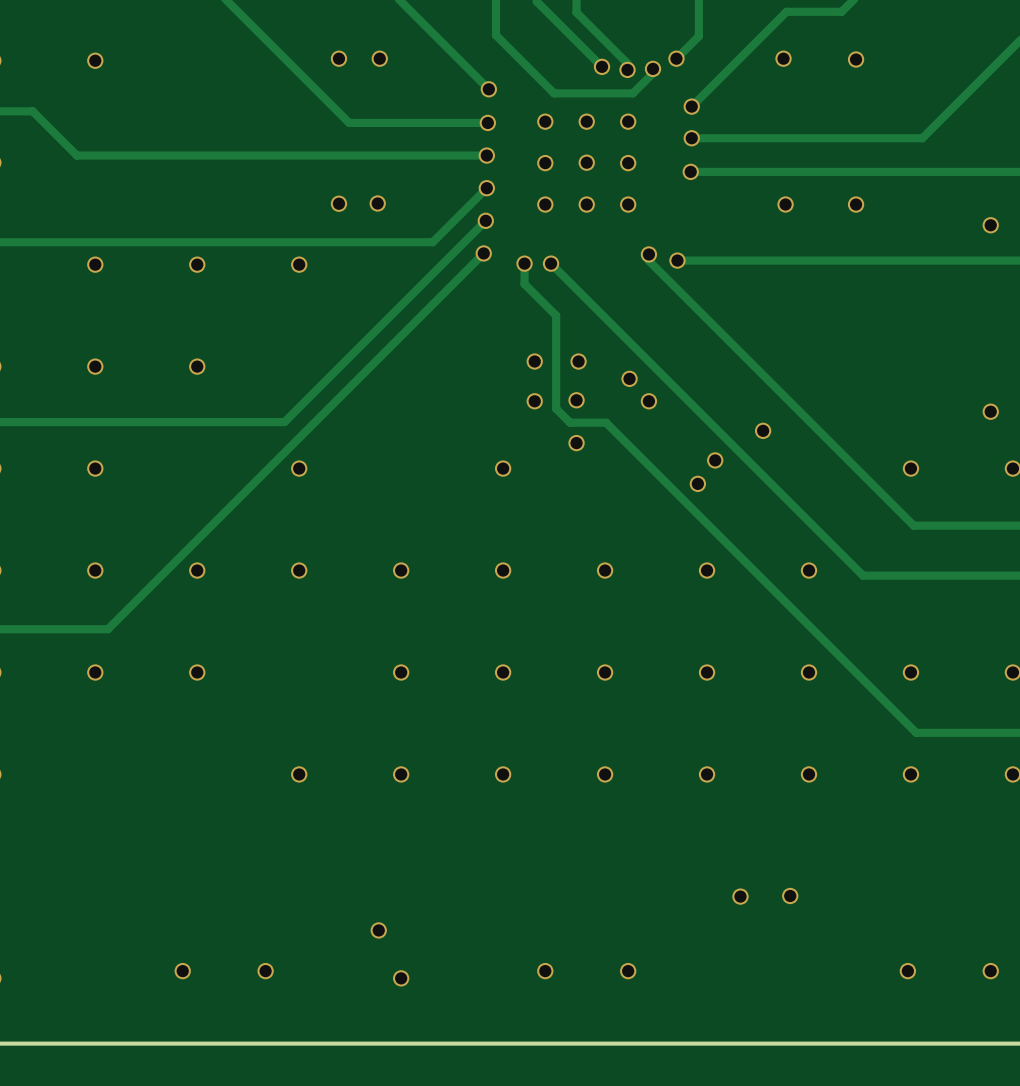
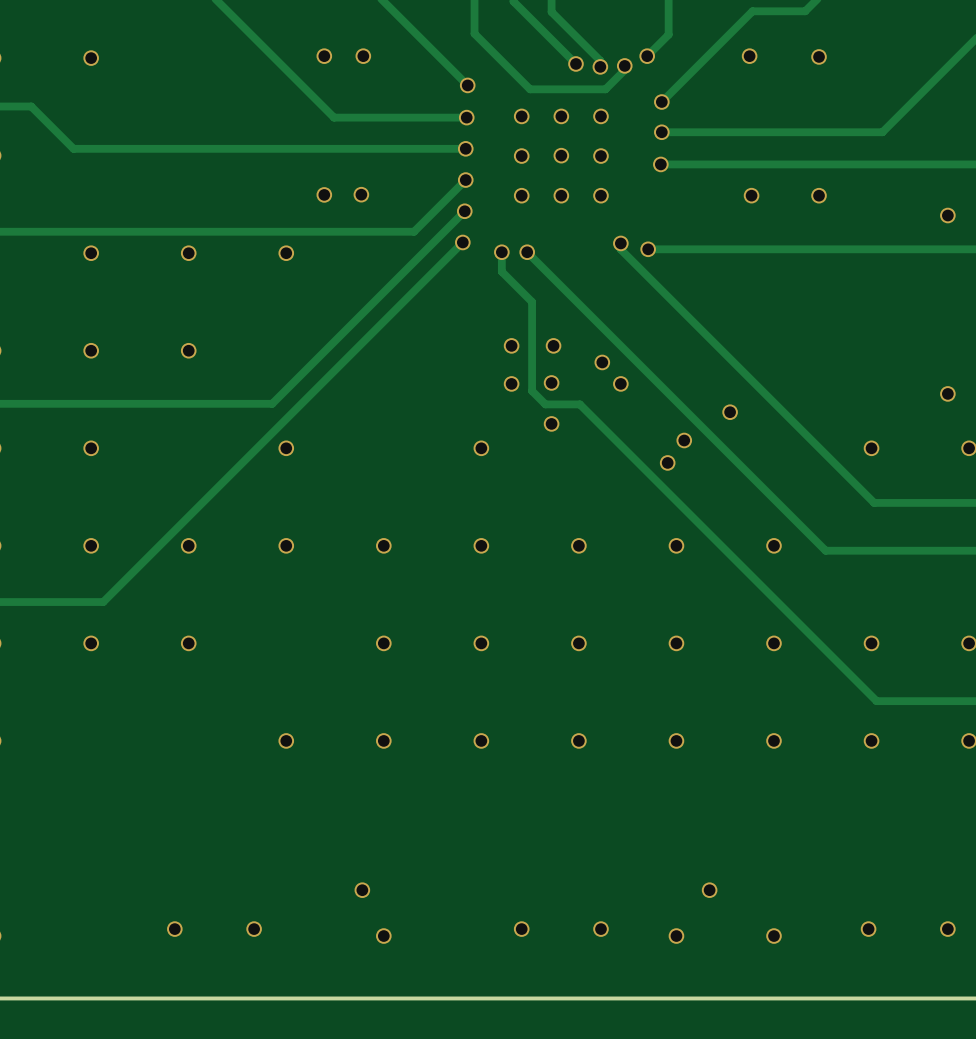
via: (790, 895) -> none
via: (740, 896) -> none
via: none -> (709, 890)
via: none -> (676, 936)
via: none -> (774, 936)

